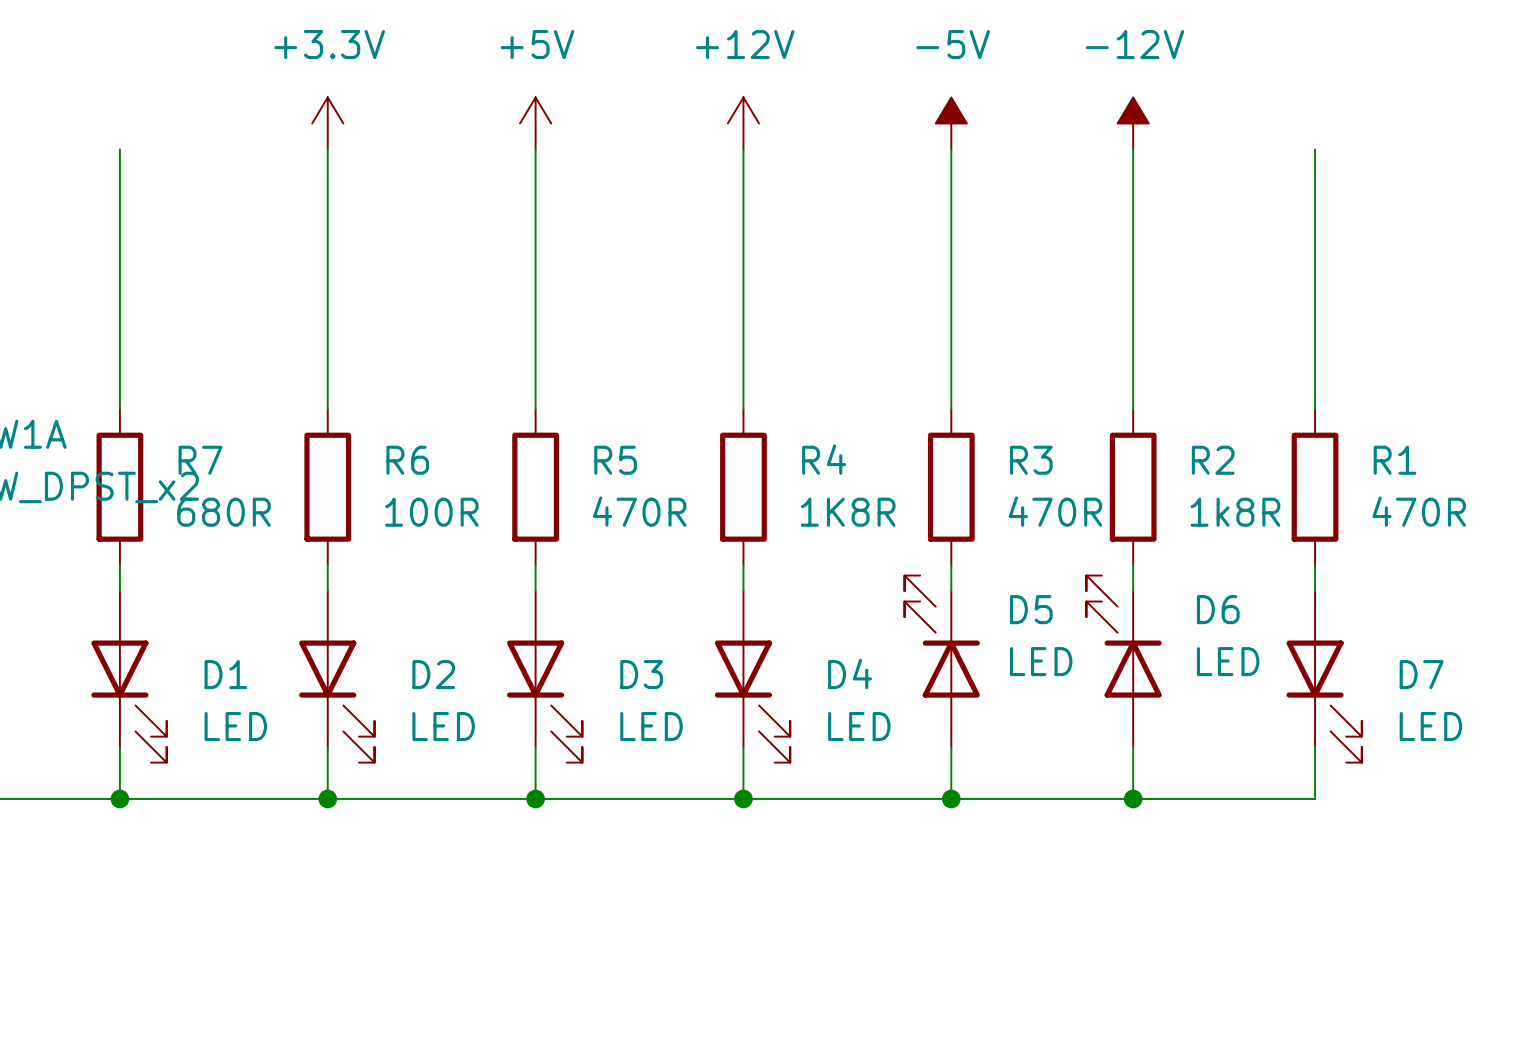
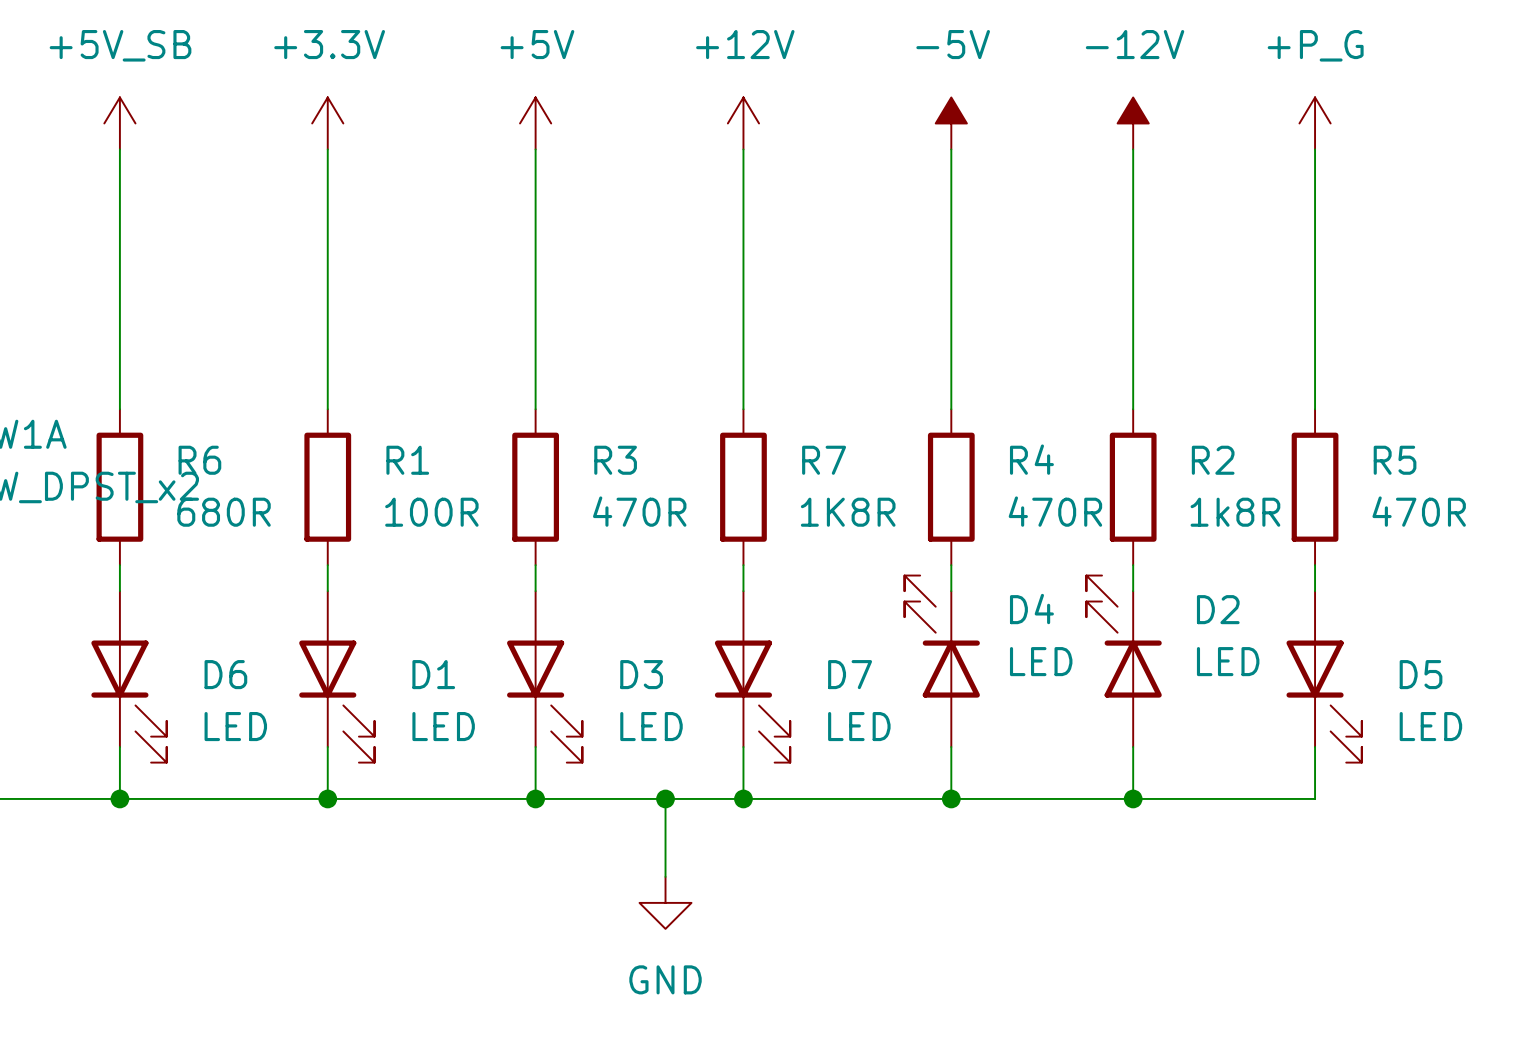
power symbol: none -> +5V_SB (119, 123)
power symbol: none -> +P_G (1315, 123)
R4 name: R4 (824, 459) -> R7 (824, 460)
R7 name: R7 (200, 460) -> R6 (199, 460)
R6 name: R6 (407, 460) -> R1 (407, 460)
R5 name: R5 (615, 460) -> R3 (615, 460)
R3 name: R3 (1031, 460) -> R4 (1031, 459)
R1 name: R1 (1395, 460) -> R5 (1395, 460)
D5 name: D5 (1031, 609) -> D4 (1031, 609)
D6 name: D6 (1218, 609) -> D2 (1218, 609)
D4 name: D4 (850, 673) -> D7 (850, 674)
D1 name: D1 (225, 674) -> D6 (225, 674)
D2 name: D2 (433, 674) -> D1 (433, 674)
D7 name: D7 (1421, 674) -> D5 (1421, 674)
wire: none -> (665, 798) (665, 876)
junction: none -> (665, 798)
power symbol: none -> GND (665, 902)

